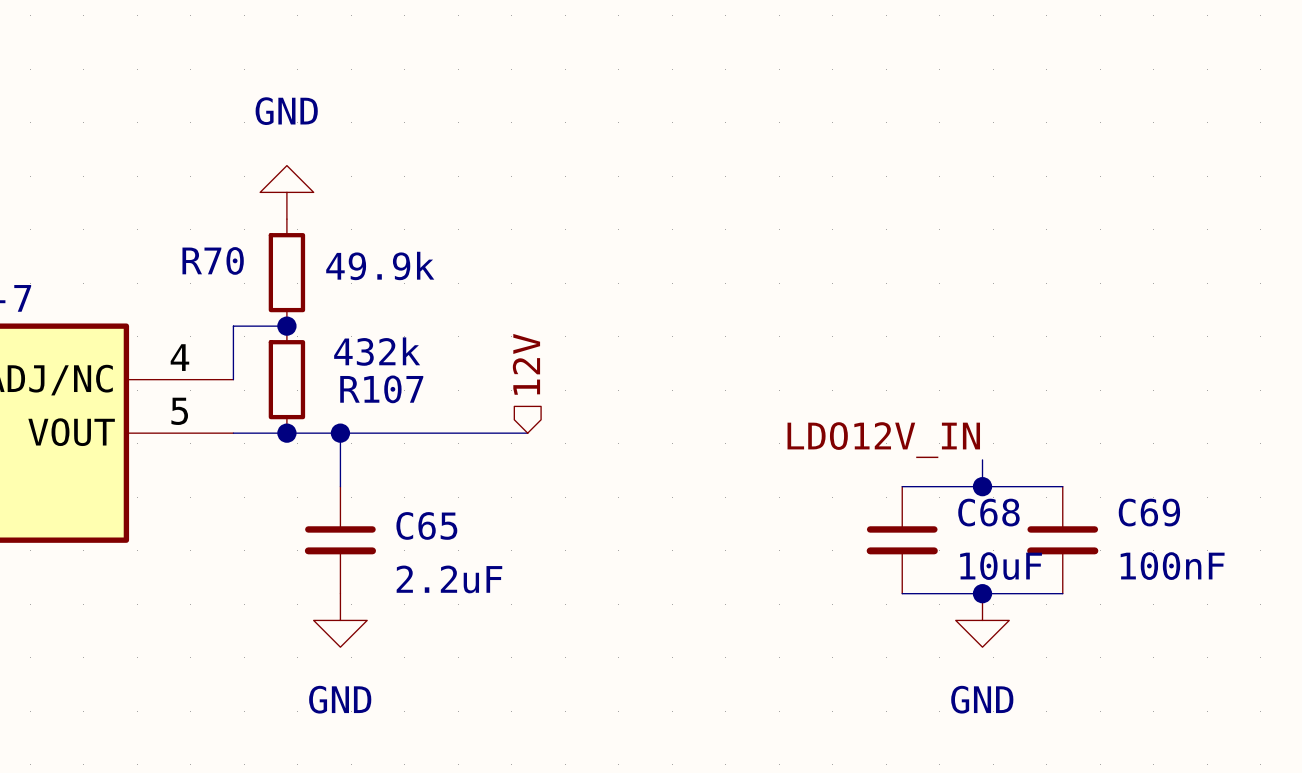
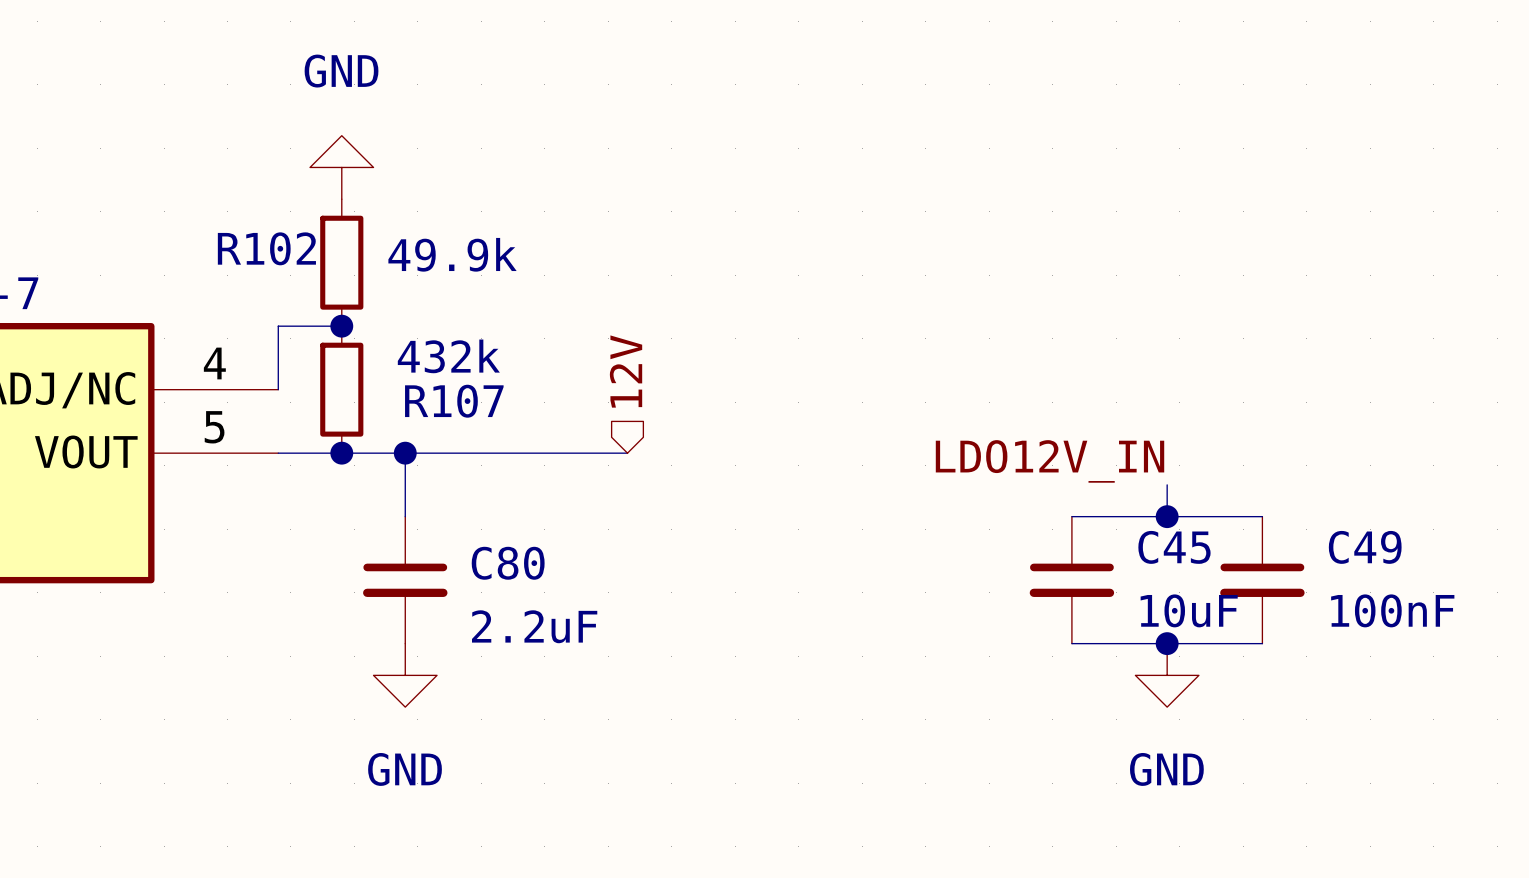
R70 name: R70 (213, 260) -> R102 (266, 248)
C68 name: C68 (988, 512) -> C45 (1174, 547)
C69 name: C69 (1149, 512) -> C49 (1365, 547)
C65 name: C65 (426, 525) -> C80 (508, 563)

